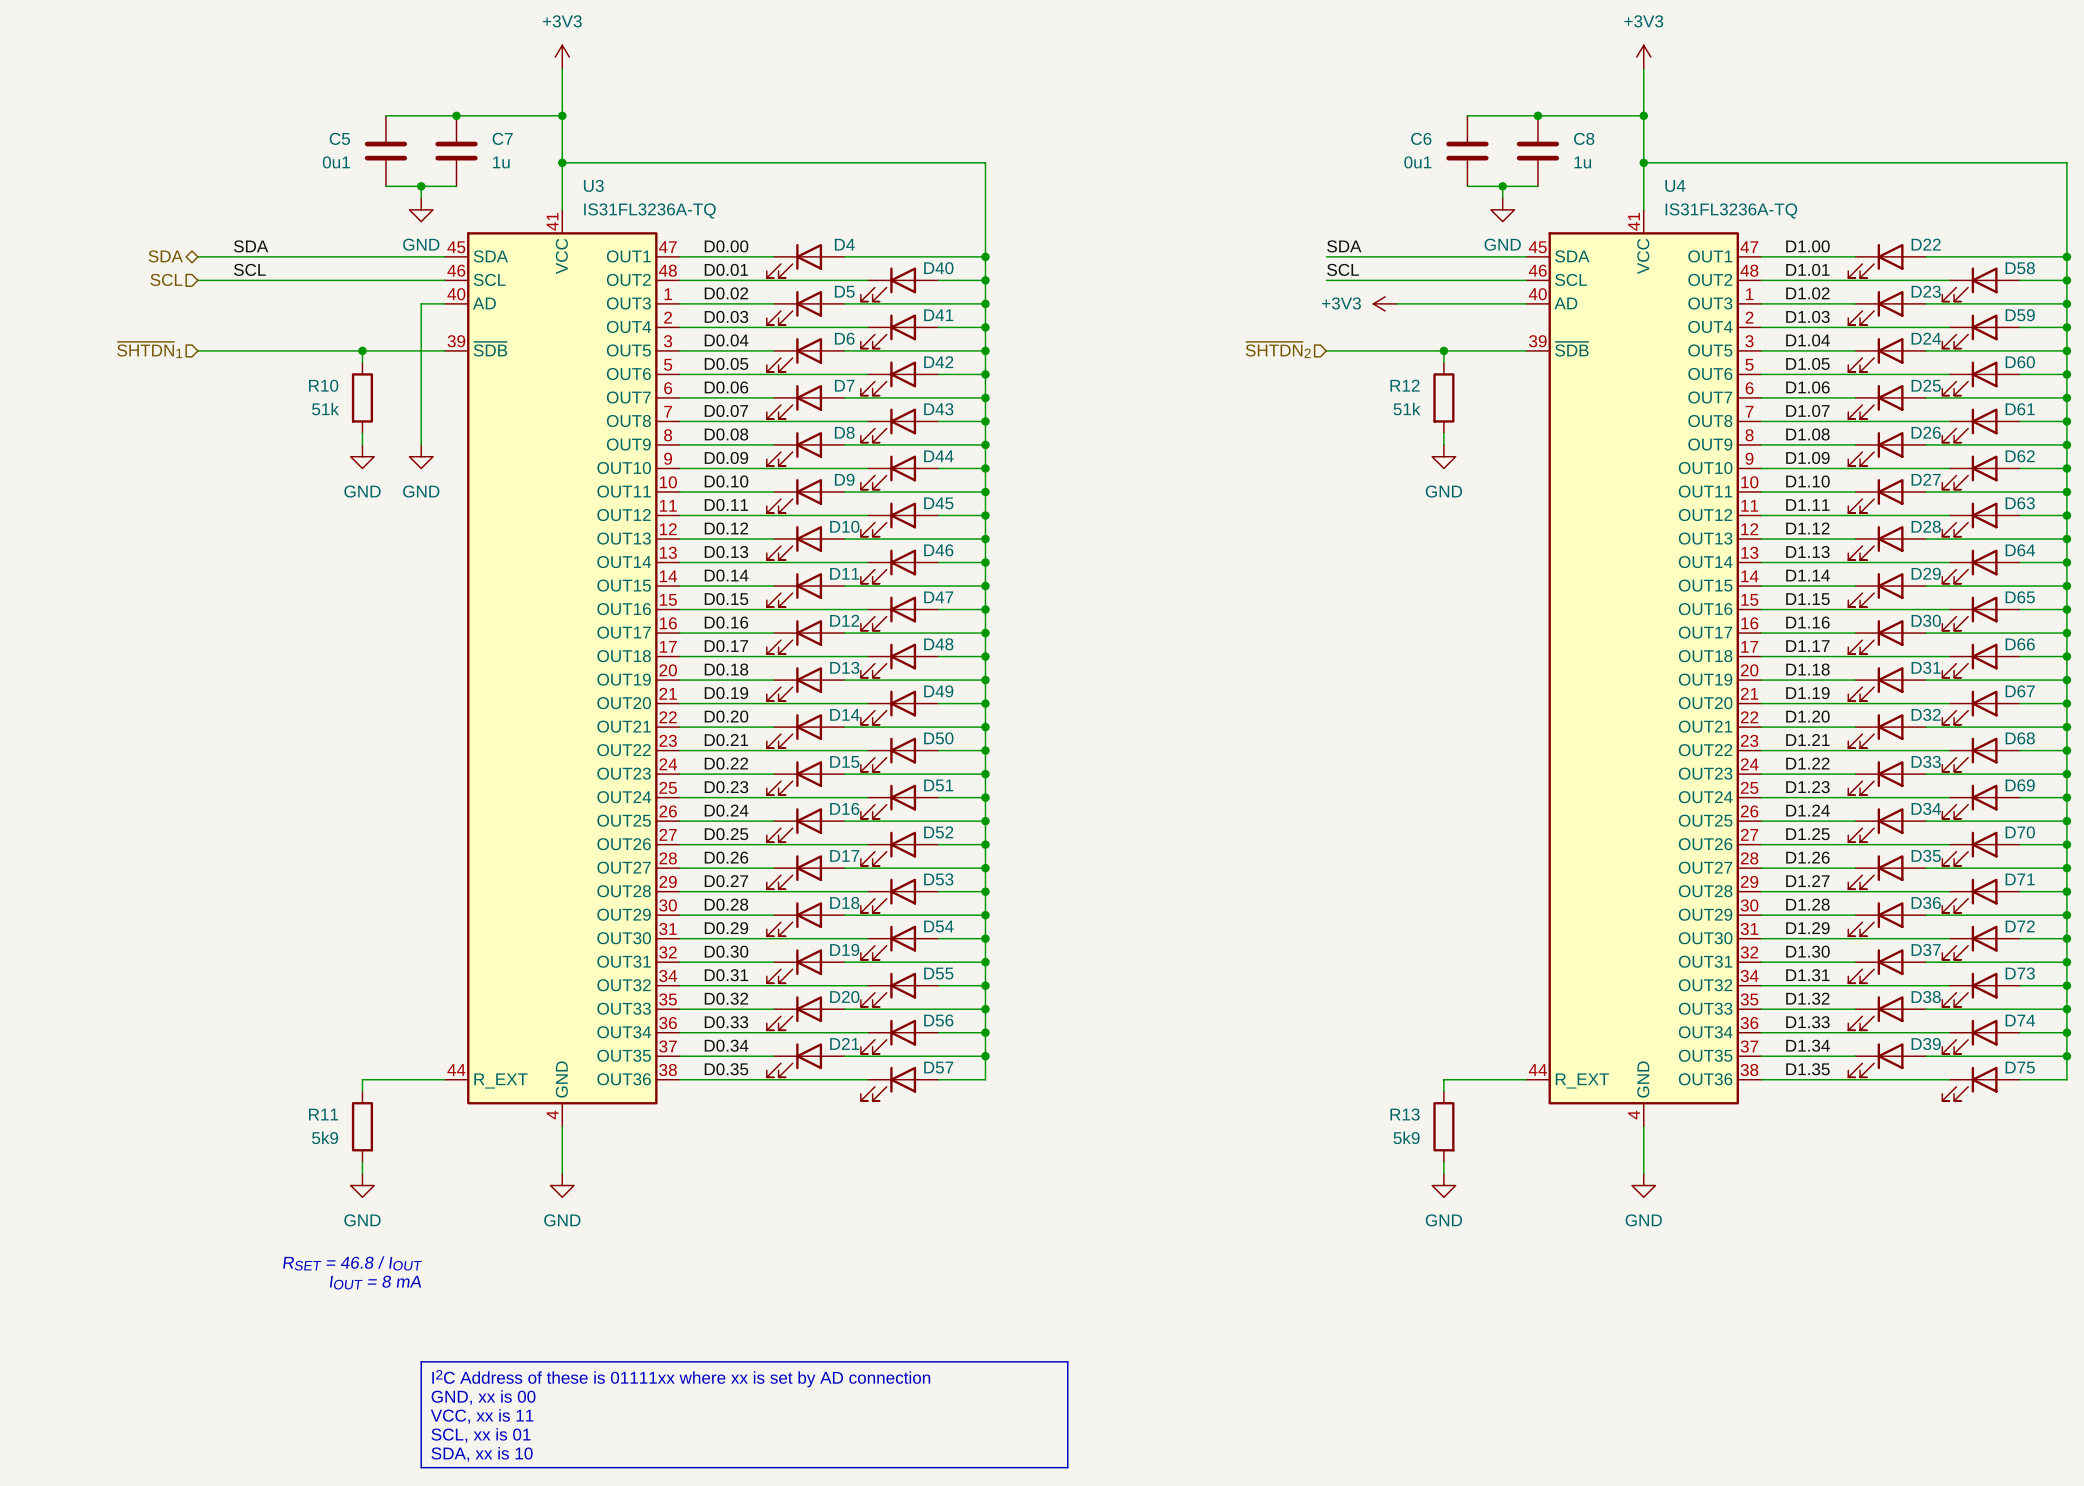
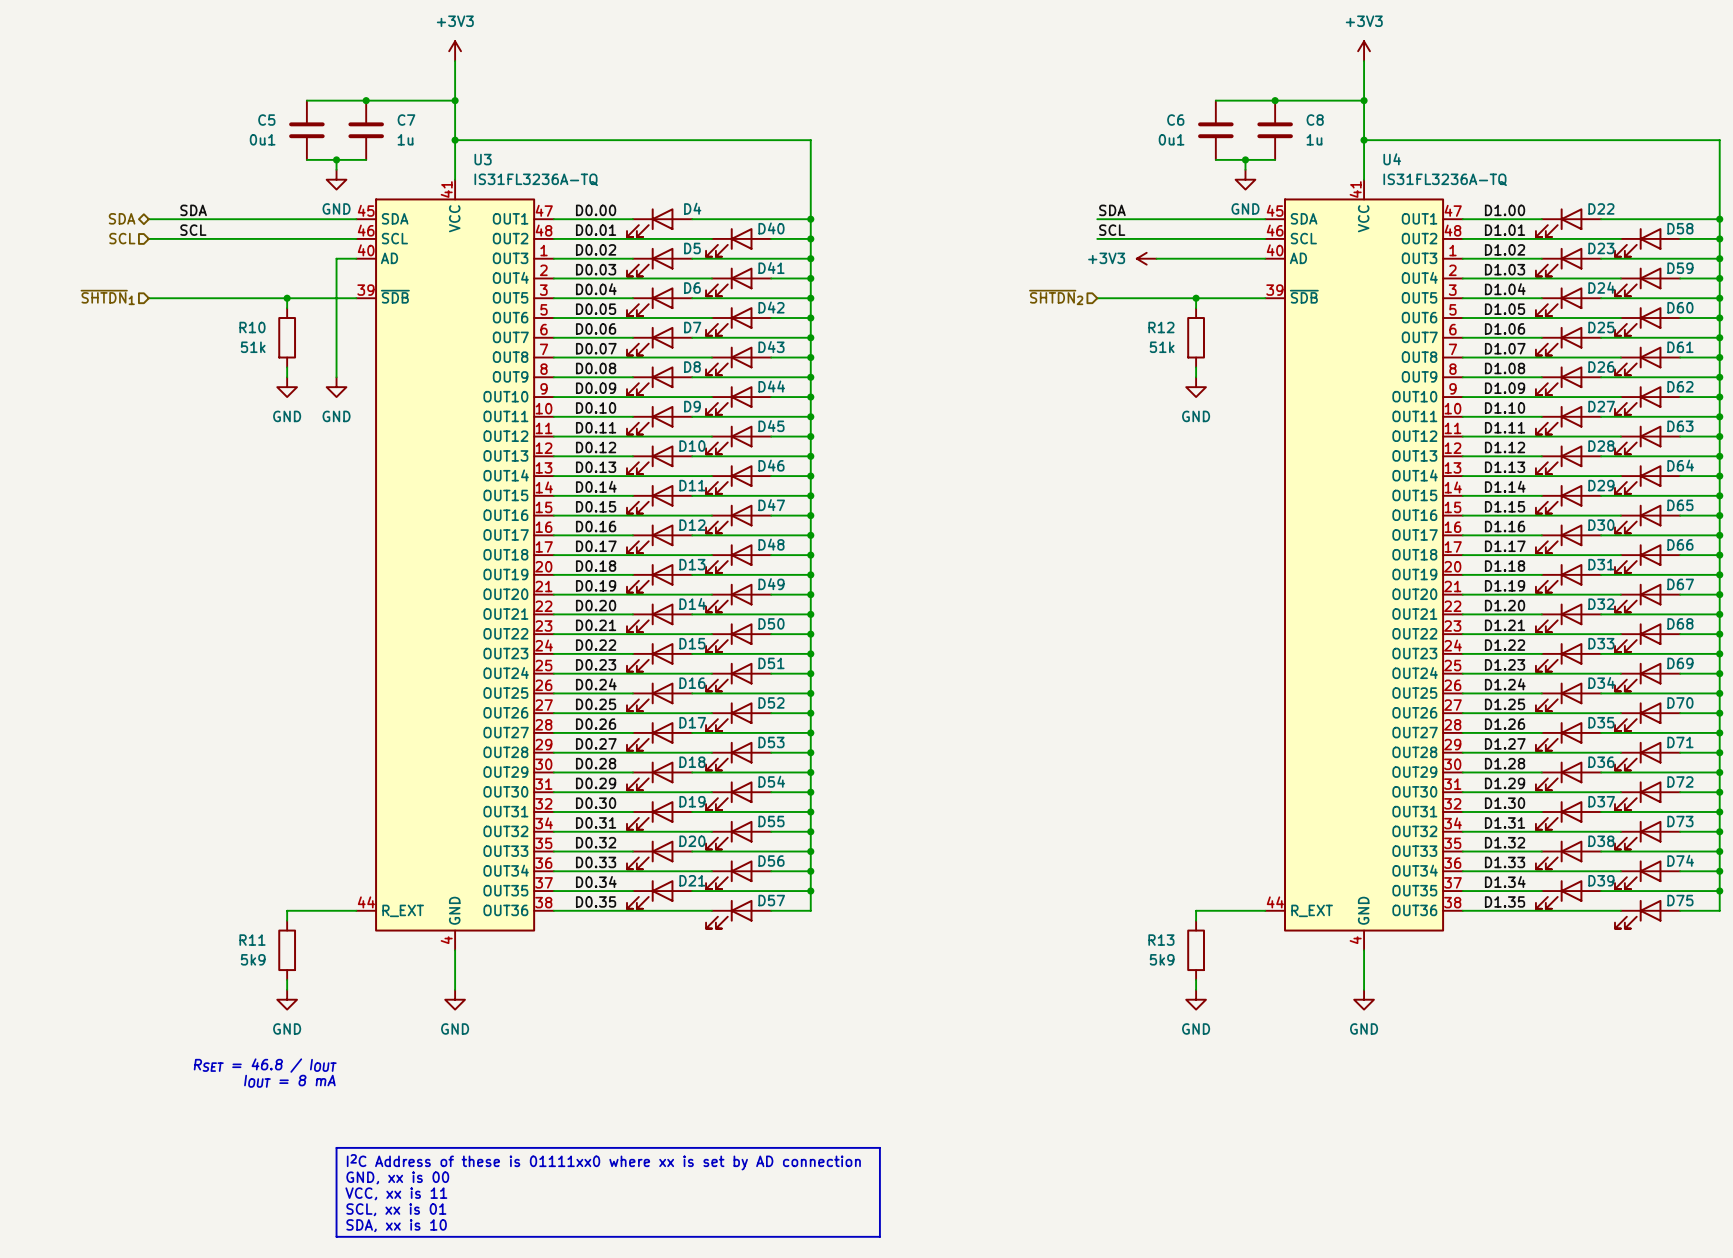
text: I2C Address of these is 01111xx where xx is set by AD connection (681, 1378) -> I2C Address of these is 01111xx0 where xx is set by AD connection (603, 1162)

